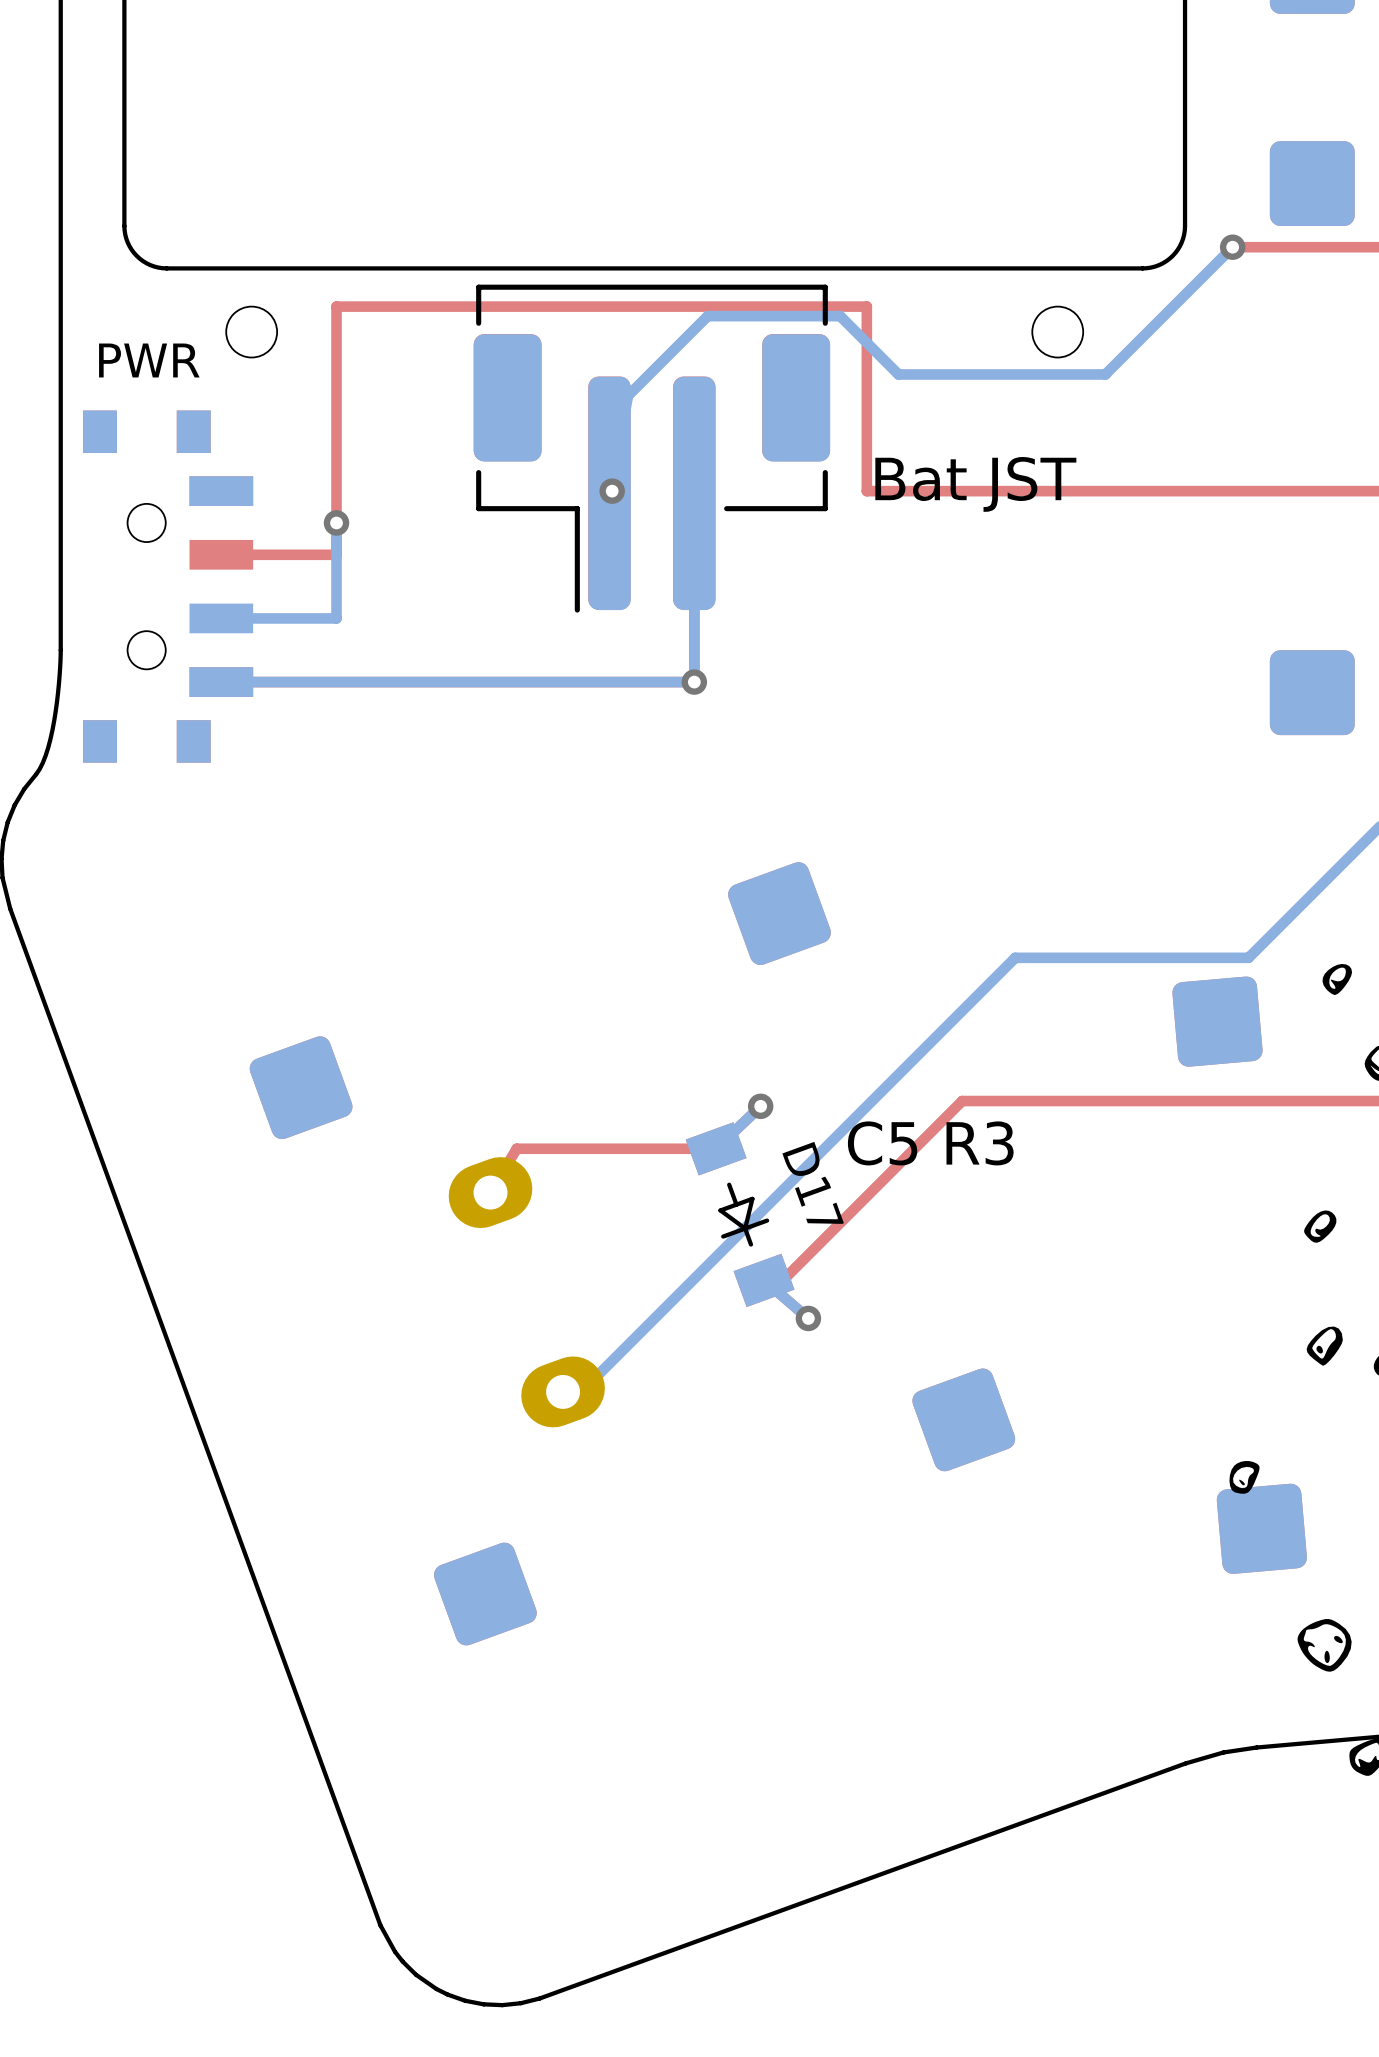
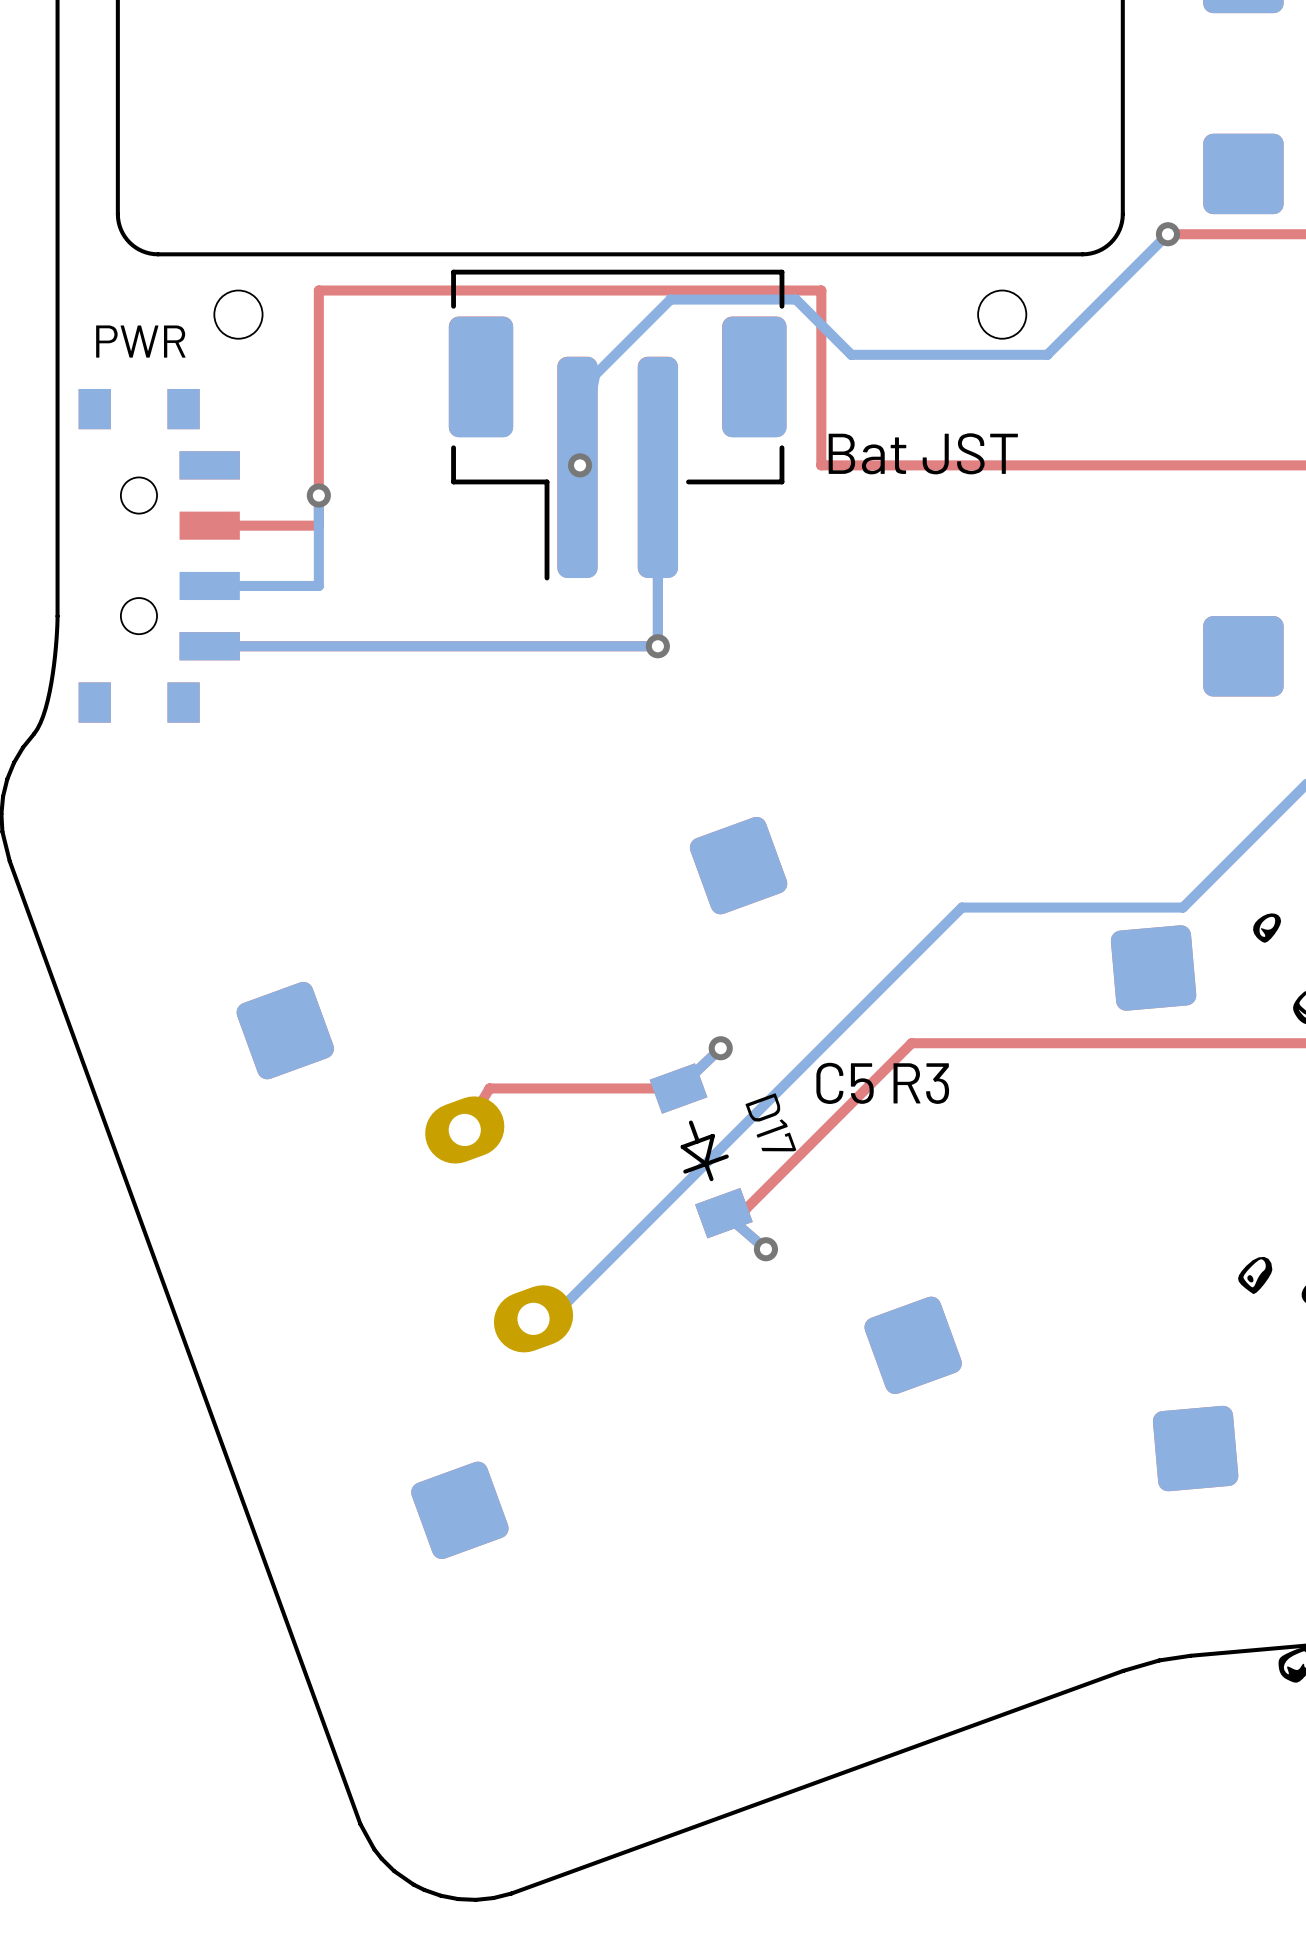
drawing: [1304, 1210, 1337, 1243] -> none
drawing: [1229, 1461, 1260, 1494] -> none
drawing: [1297, 1619, 1352, 1672] -> none

